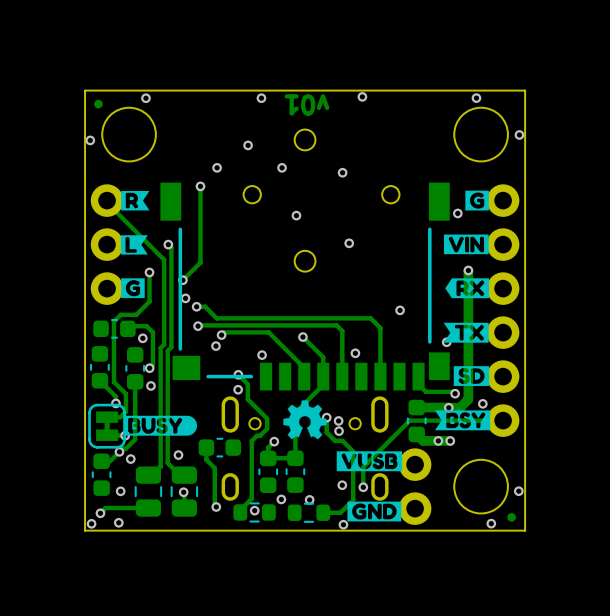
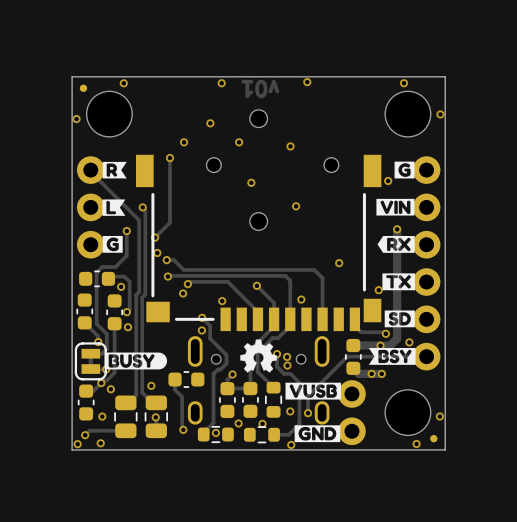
drawing shape: [443, 322, 489, 343] -> [382, 273, 415, 291]
track: none -> (290, 319) (290, 325) (278, 338) (272, 338) (257, 353) (257, 371) (273, 387)
part: none -> (273, 399)

